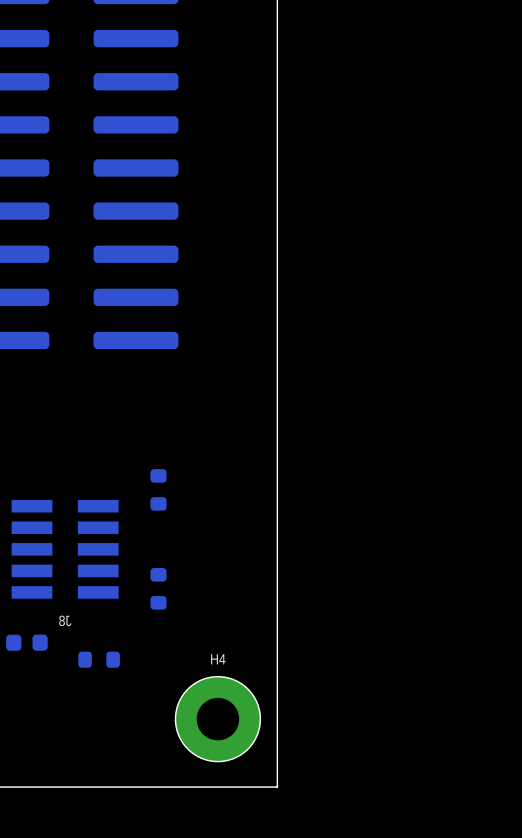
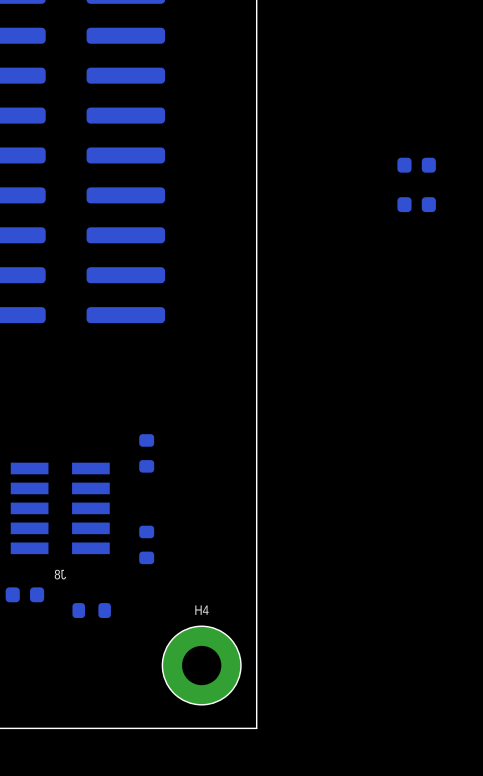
part: none -> (416, 165)
part: none -> (416, 204)

